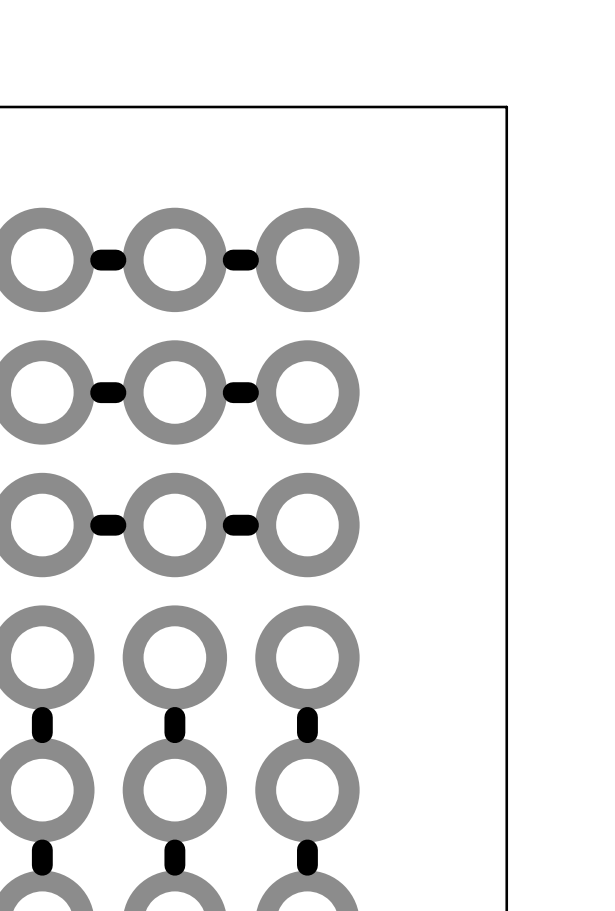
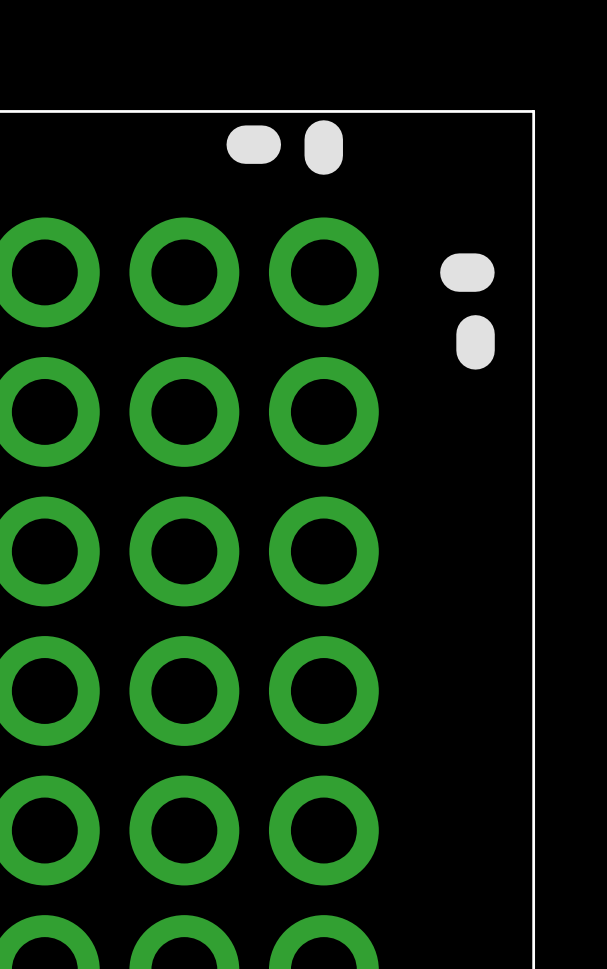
line: (100, 260) (115, 260) -> none
line: (233, 260) (248, 260) -> (245, 144) (261, 144)
line: (100, 392) (115, 392) -> none
line: (233, 392) (248, 392) -> (459, 272) (475, 272)
line: (100, 525) (115, 525) -> none
line: (233, 525) (248, 525) -> none
line: (42, 717) (42, 732) -> none
line: (174, 717) (174, 732) -> (323, 139) (323, 155)
line: (307, 717) (307, 732) -> (475, 334) (475, 350)
line: (42, 849) (42, 865) -> none
line: (174, 849) (174, 865) -> none
line: (307, 849) (307, 865) -> none

